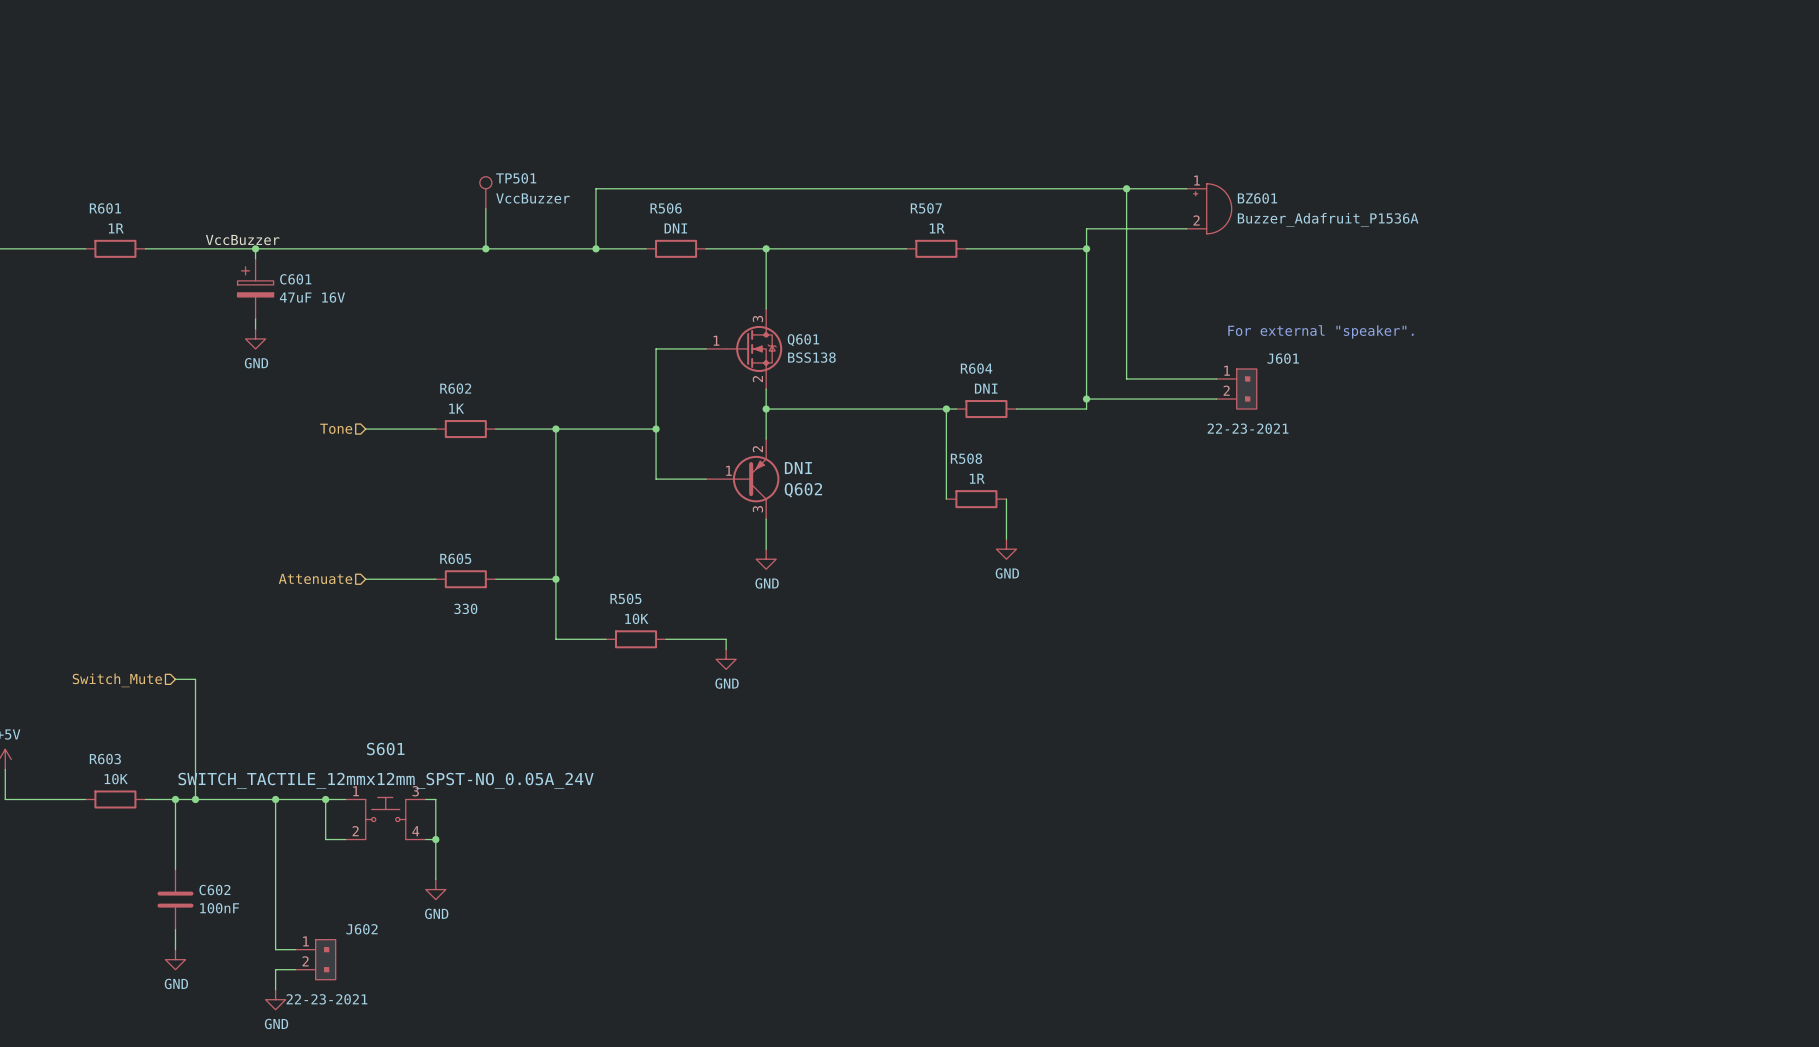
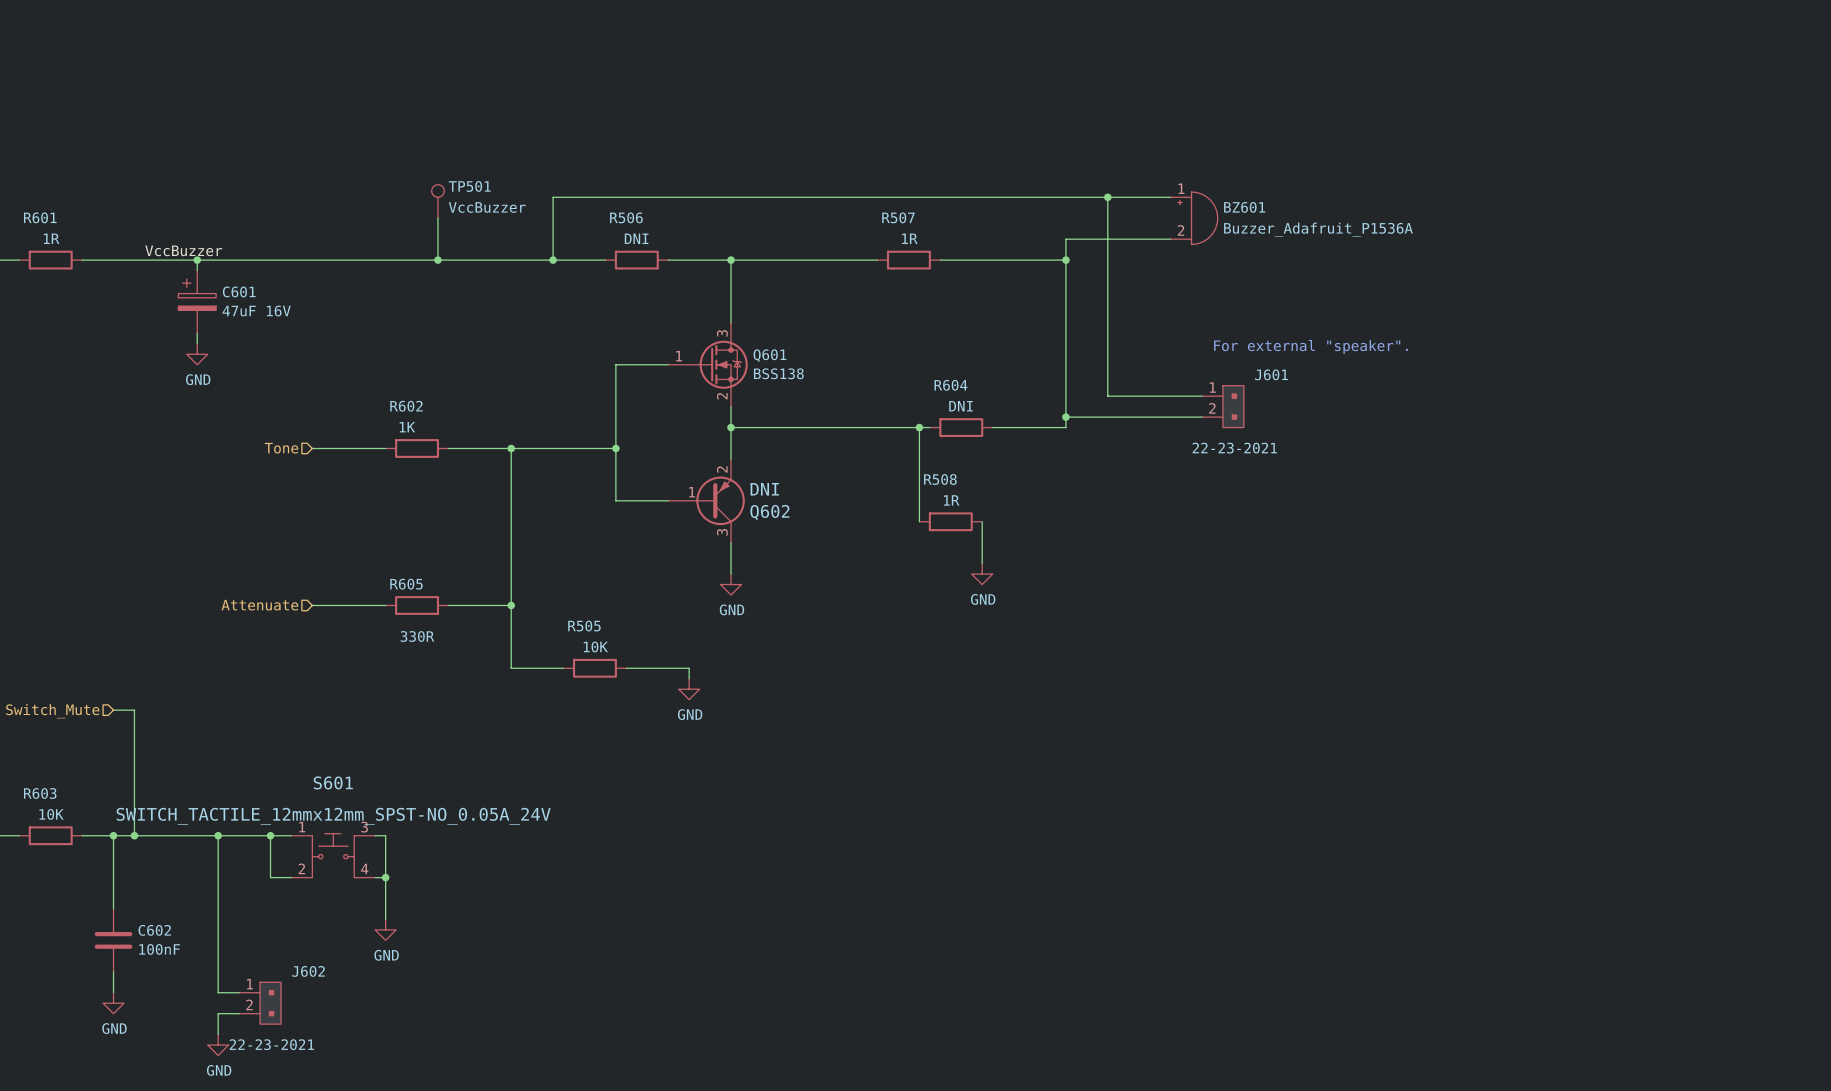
R605 value: 330 (465, 608) -> 330R (417, 636)

